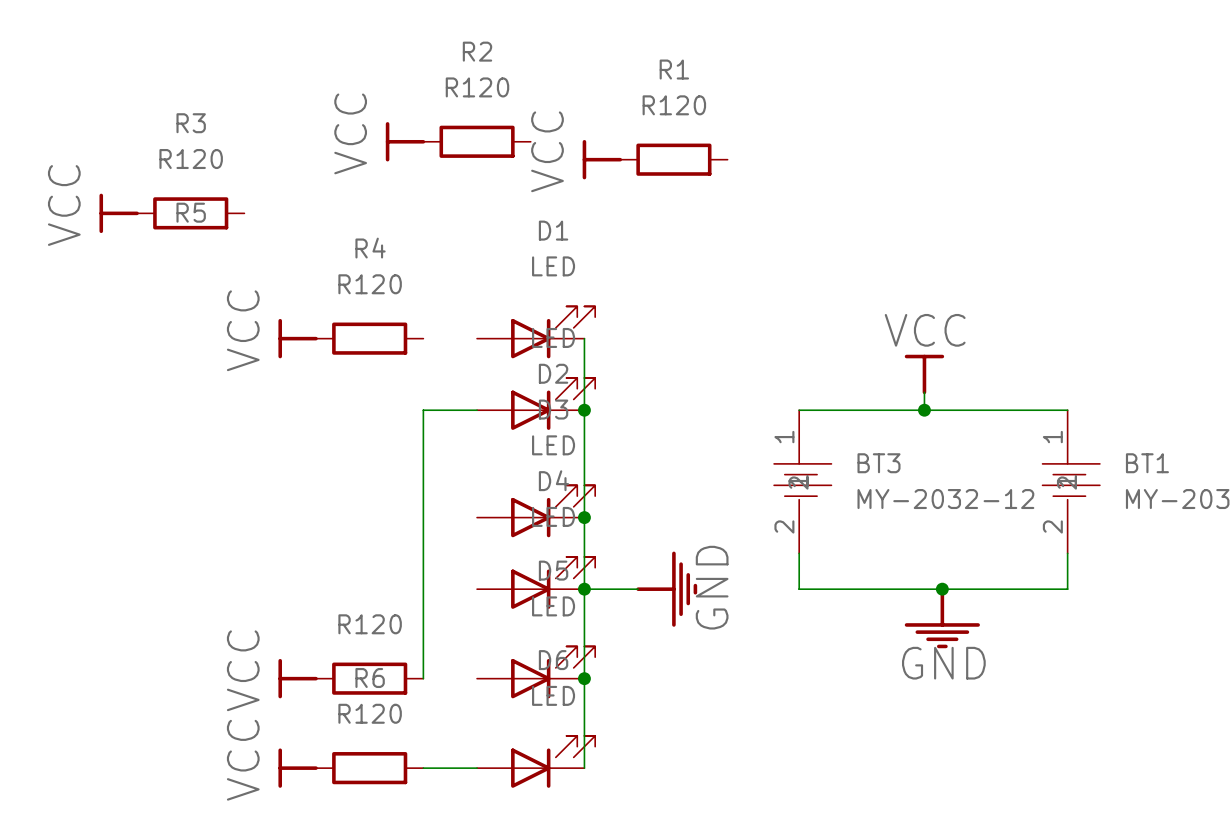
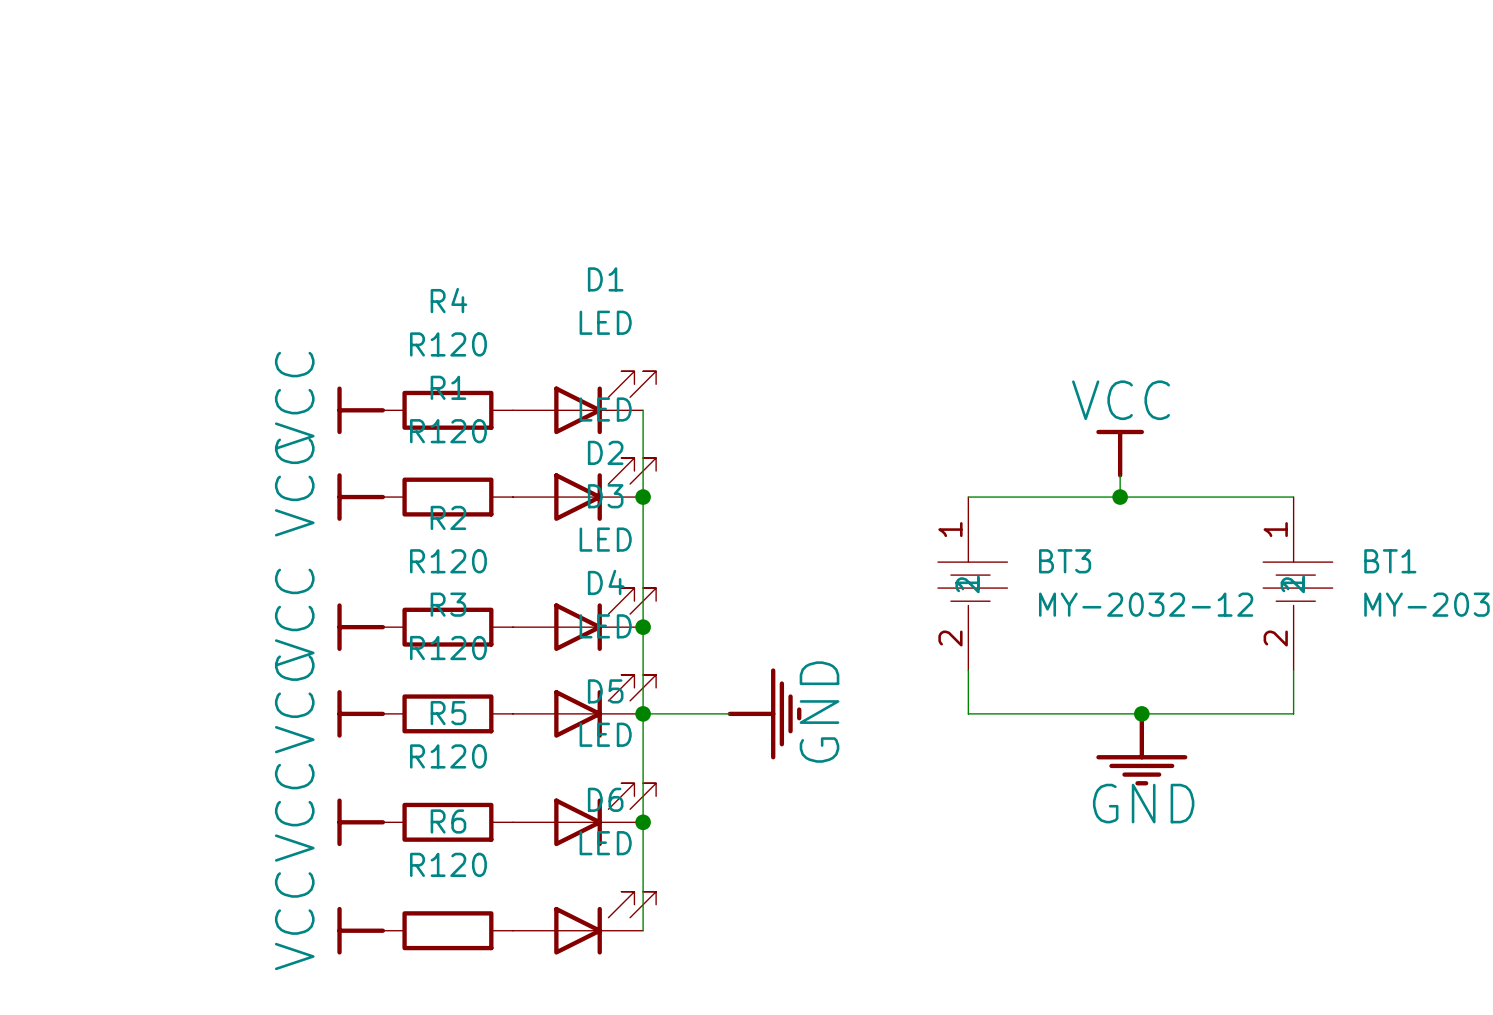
power symbol: VCC (405, 141) -> none
R2 position: (477, 141) -> (447, 627)
power symbol: VCC (602, 159) -> none
R1 position: (673, 159) -> (447, 497)
R5 name position: R5 (191, 212) -> R5 (448, 713)
power symbol: VCC (119, 213) -> none
R3 position: (190, 213) -> (447, 713)
D1 position: (536, 332) -> (584, 402)
wire: (584, 338) (584, 768) -> (643, 410) (643, 930)
D2 position: (536, 403) -> (584, 489)
power symbol: none -> VCC (361, 497)
wire: (477, 410) (423, 410) (423, 678) -> none
junction position: (584, 410) -> (643, 497)
D3 position: (536, 511) -> (584, 619)
power symbol: none -> VCC (361, 627)
junction: none -> (643, 627)
junction: (584, 517) -> none
D4 position: (536, 582) -> (584, 706)
power symbol: none -> VCC (361, 713)
junction: none -> (643, 713)
junction: (584, 589) -> none
power symbol position: GND (666, 589) -> GND (764, 713)
D5 position: (536, 672) -> (584, 814)
junction: none -> (643, 822)
junction: (584, 678) -> none
D6 position: (536, 761) -> (584, 923)

